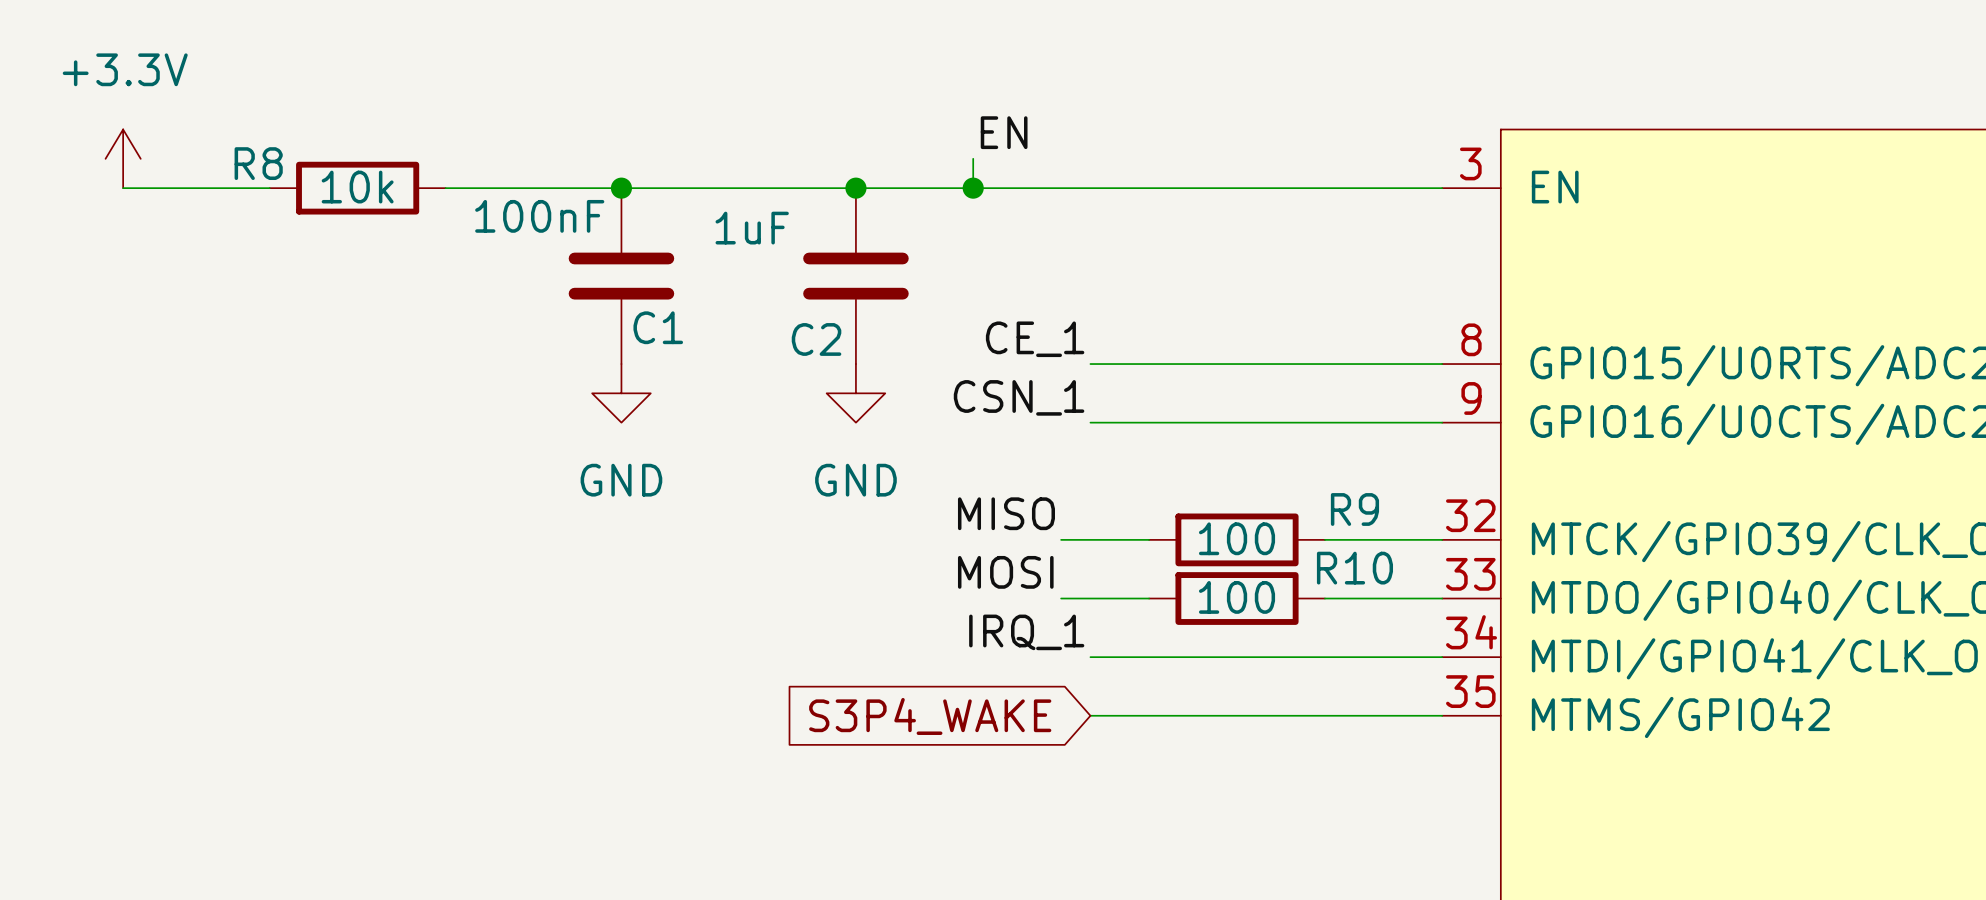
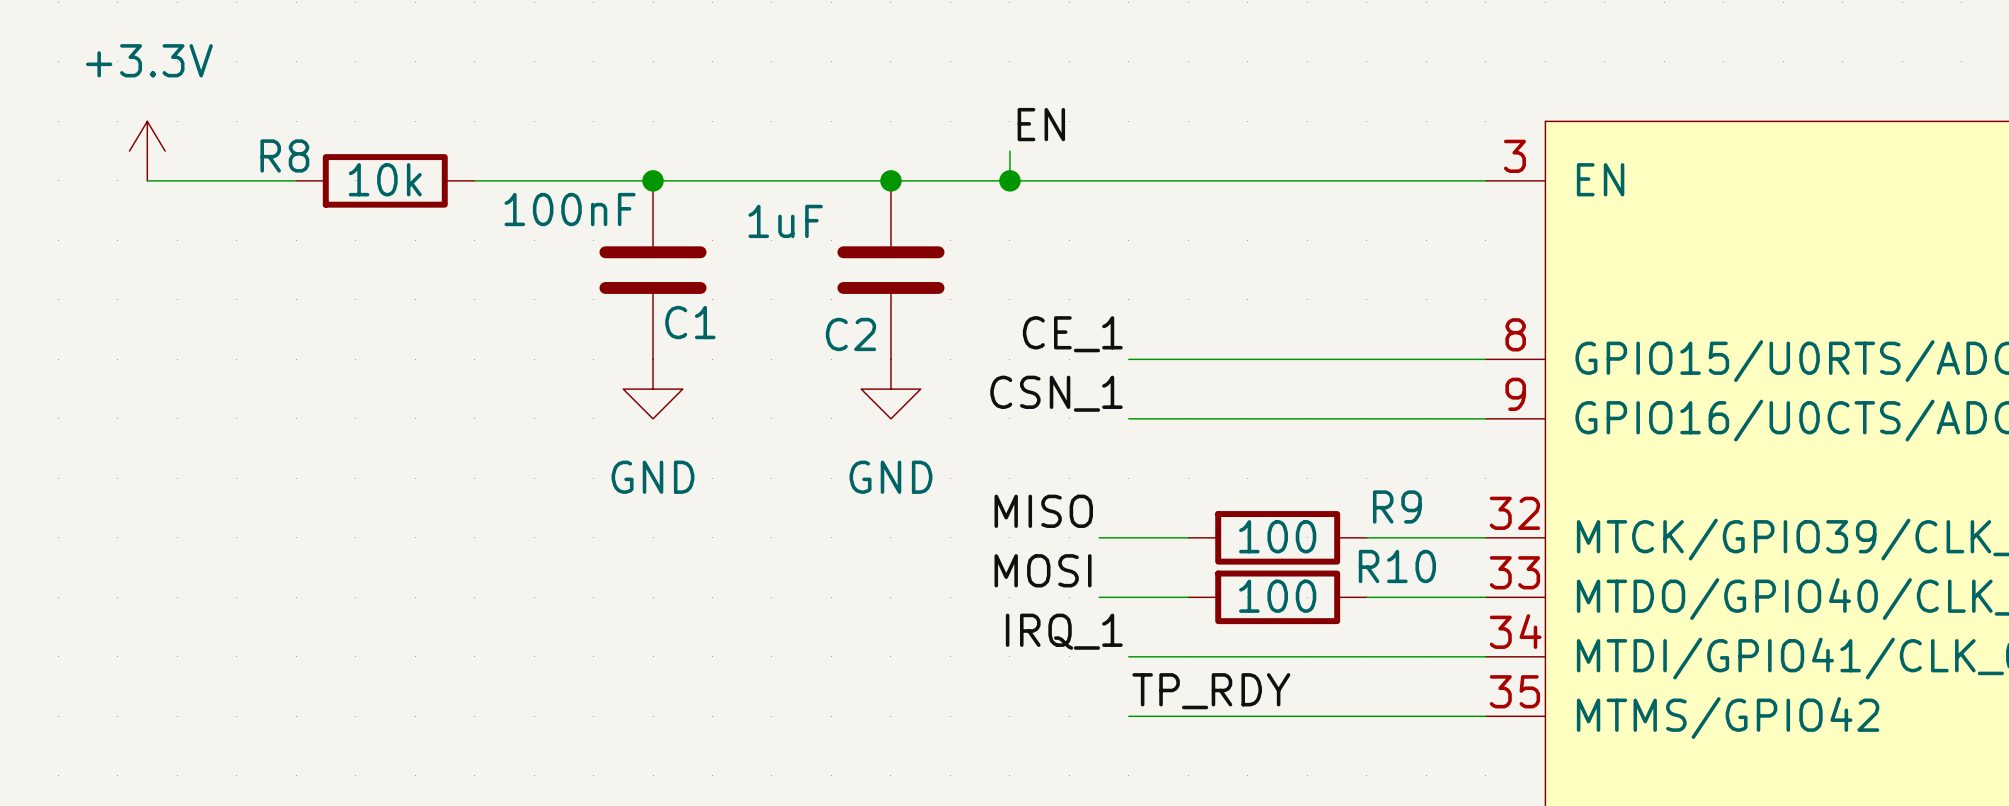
label: none -> TP_RDY (1211, 691)
global label: S3P4_WAKE (930, 716) -> none

